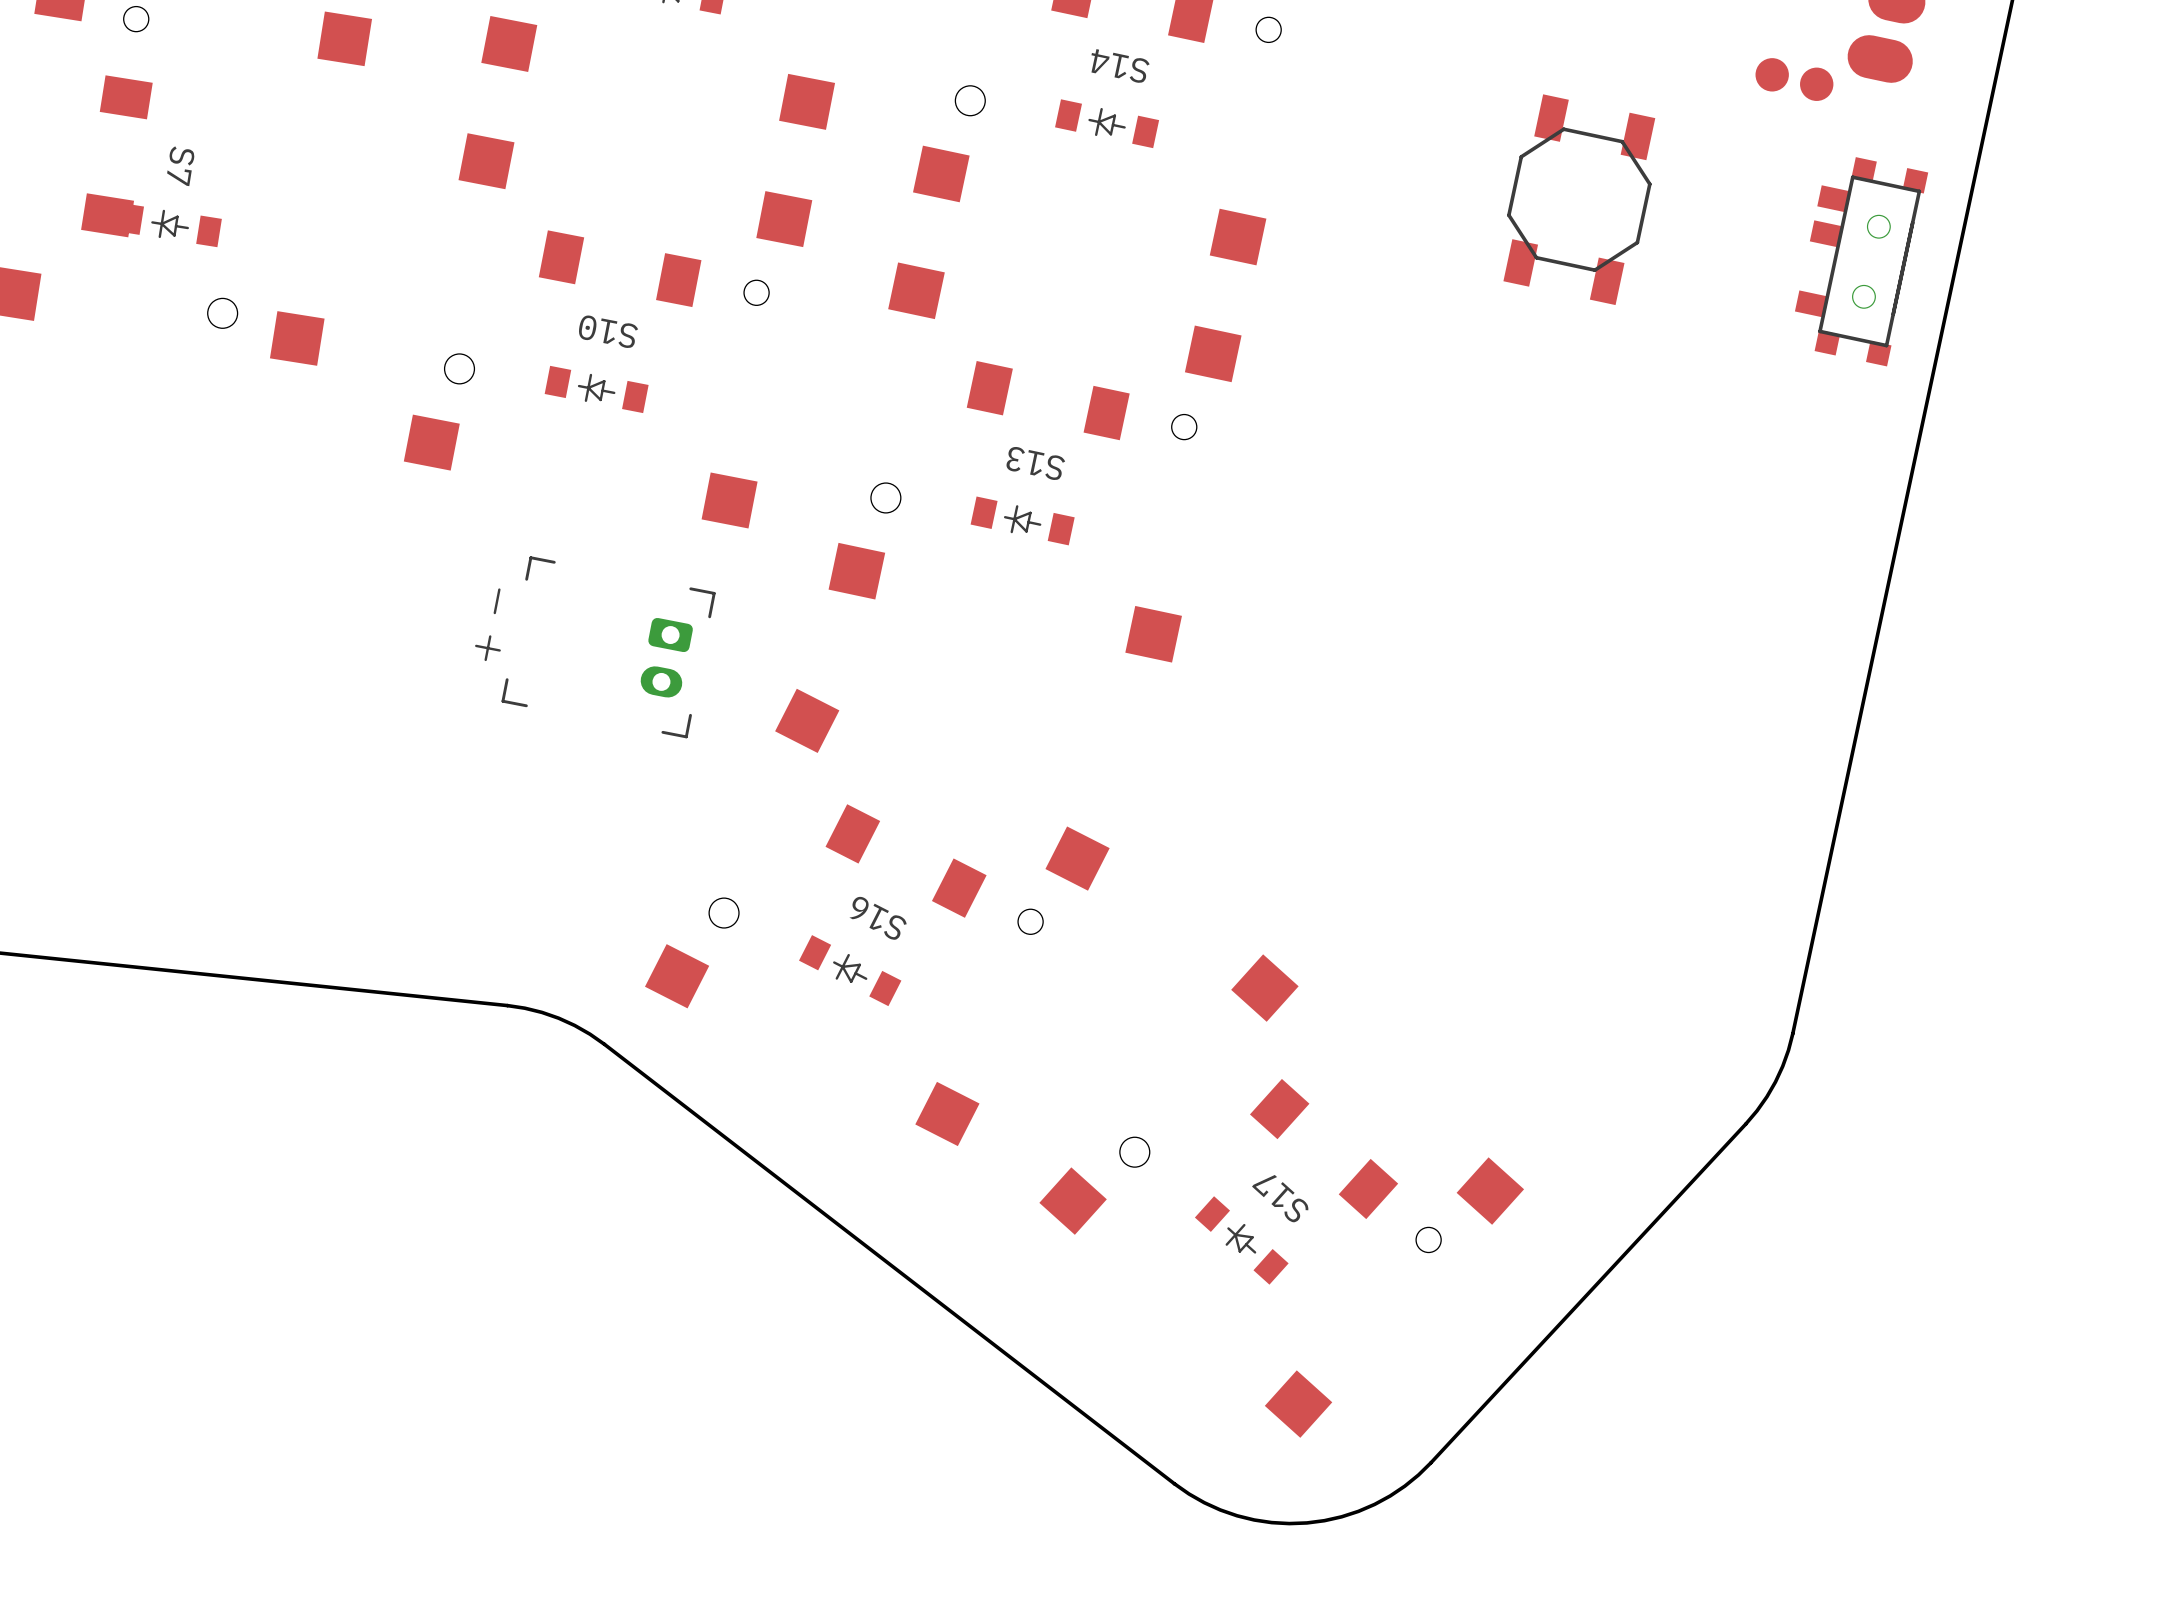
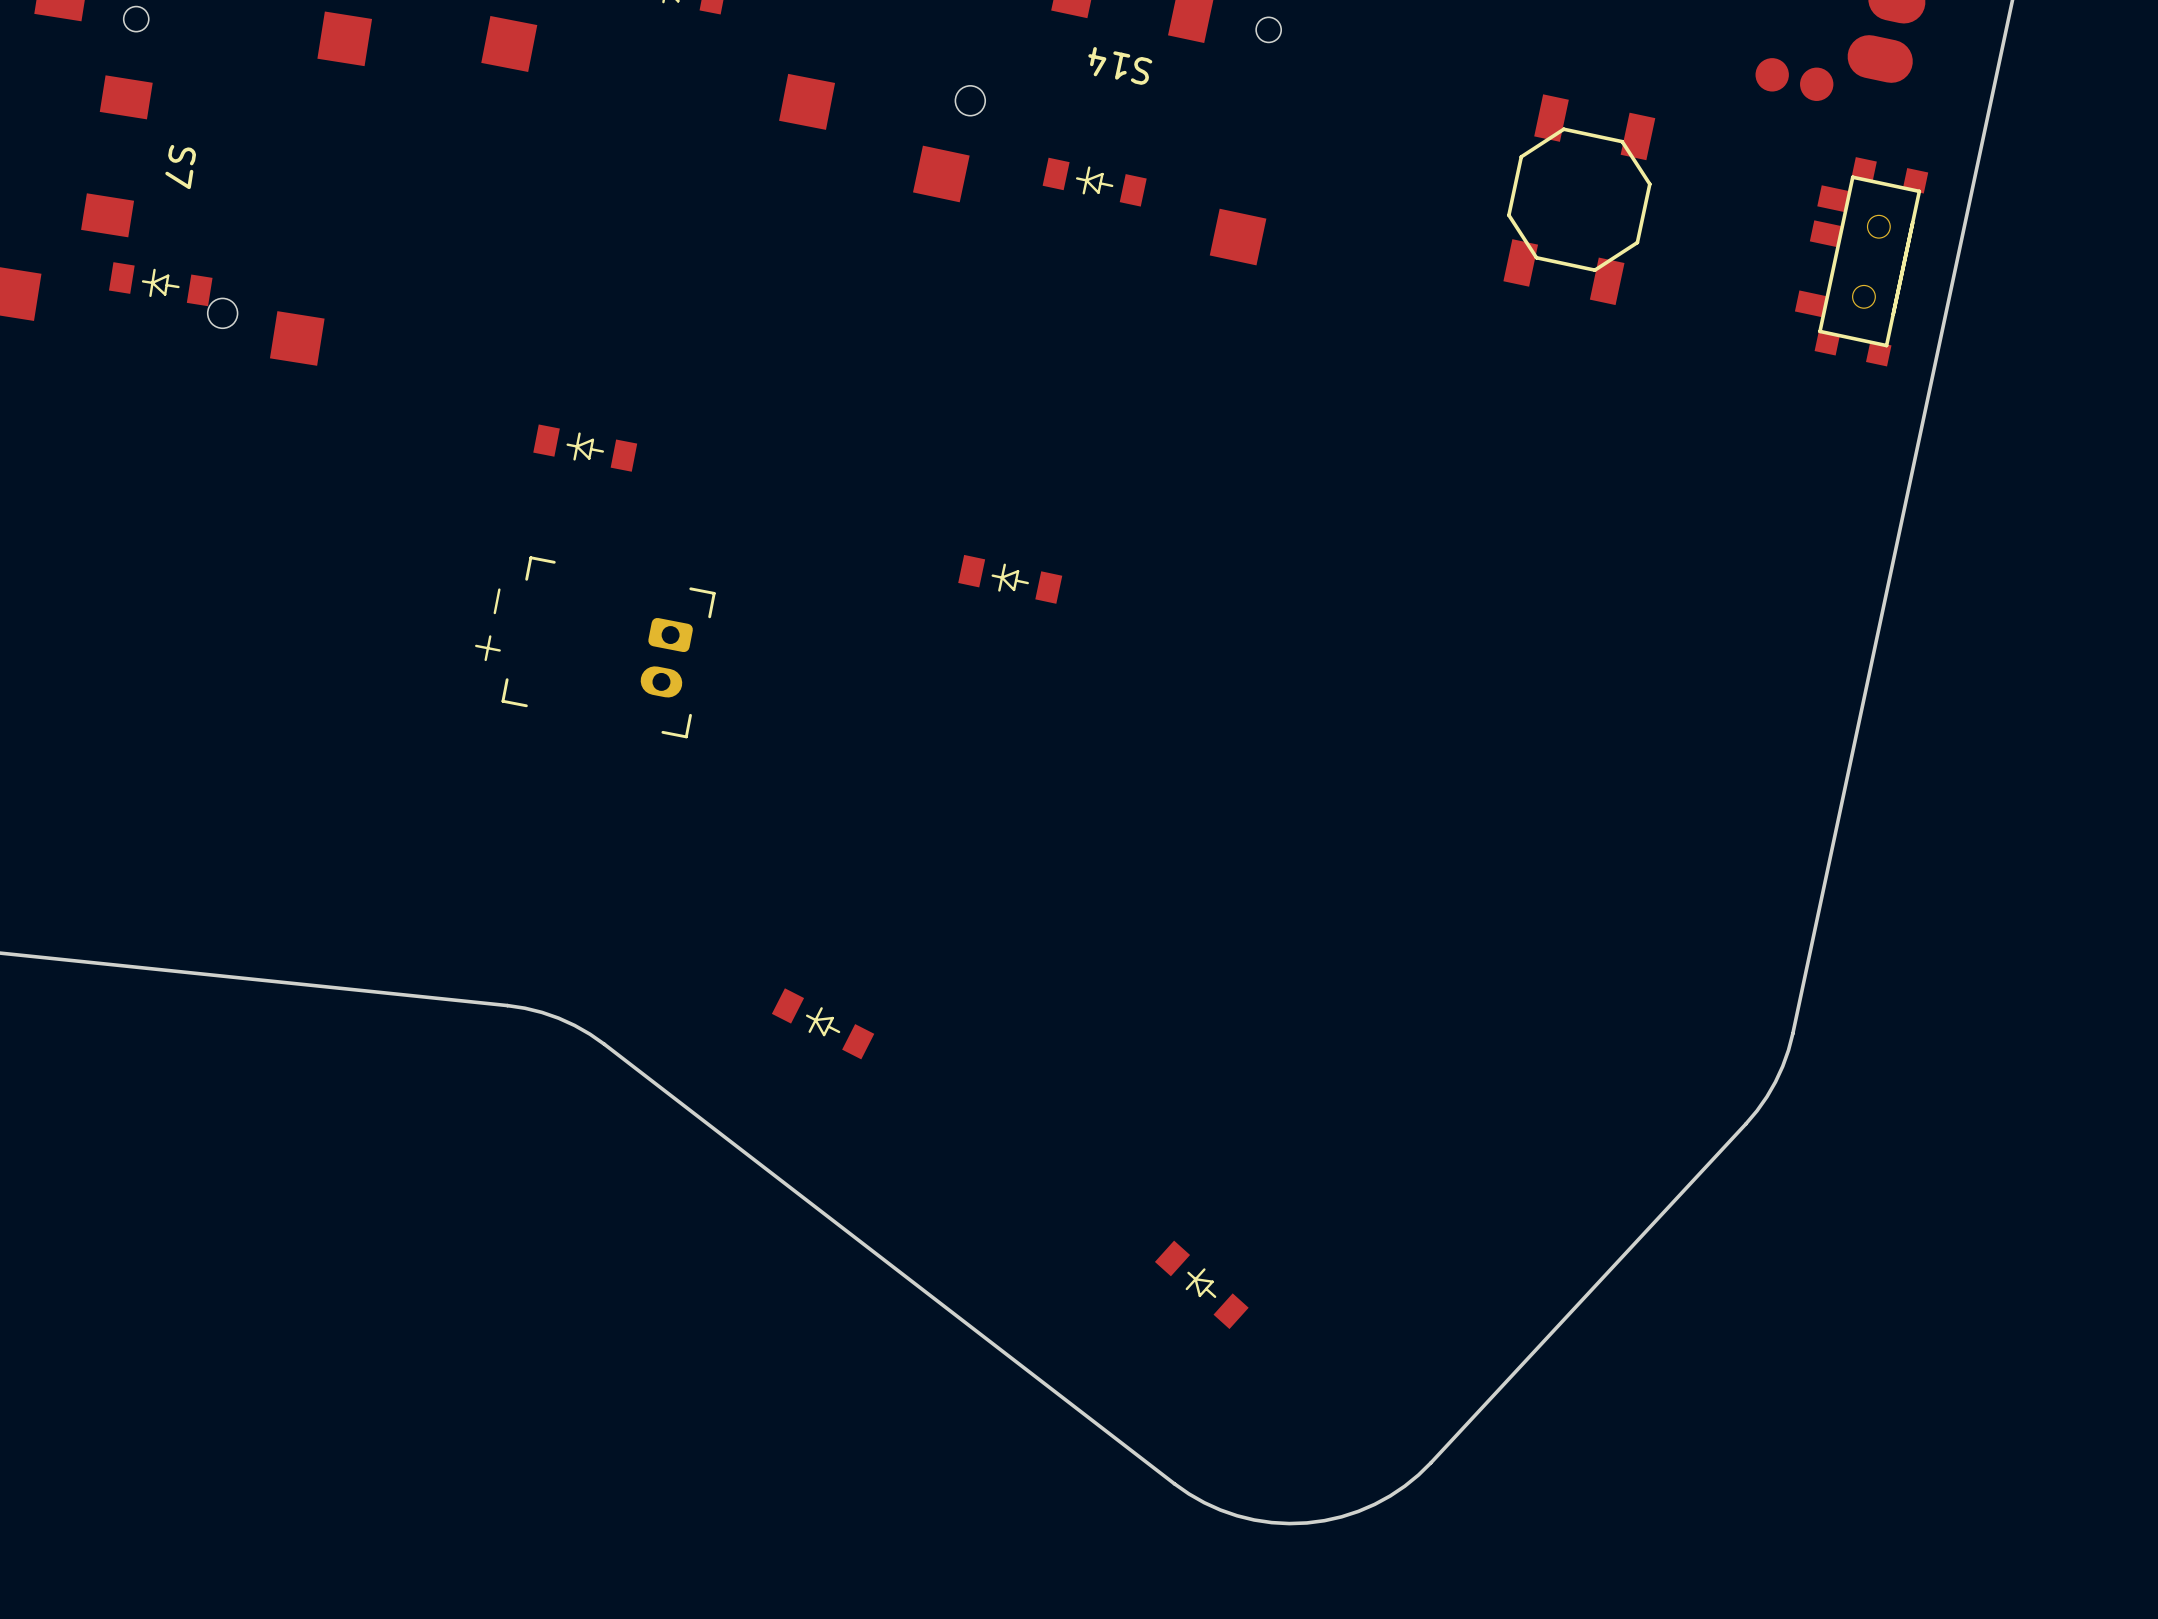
part position: (1107, 123) -> (1094, 182)
part position: (170, 225) -> (160, 284)
S10: (608, 330) -> none
part position: (596, 389) -> (585, 448)
S13: (1035, 462) -> none
part position: (1022, 520) -> (1010, 579)
S16: (877, 917) -> none
part position: (850, 970) -> (823, 1023)
S17: (1281, 1196) -> none
part position: (1241, 1240) -> (1201, 1284)

